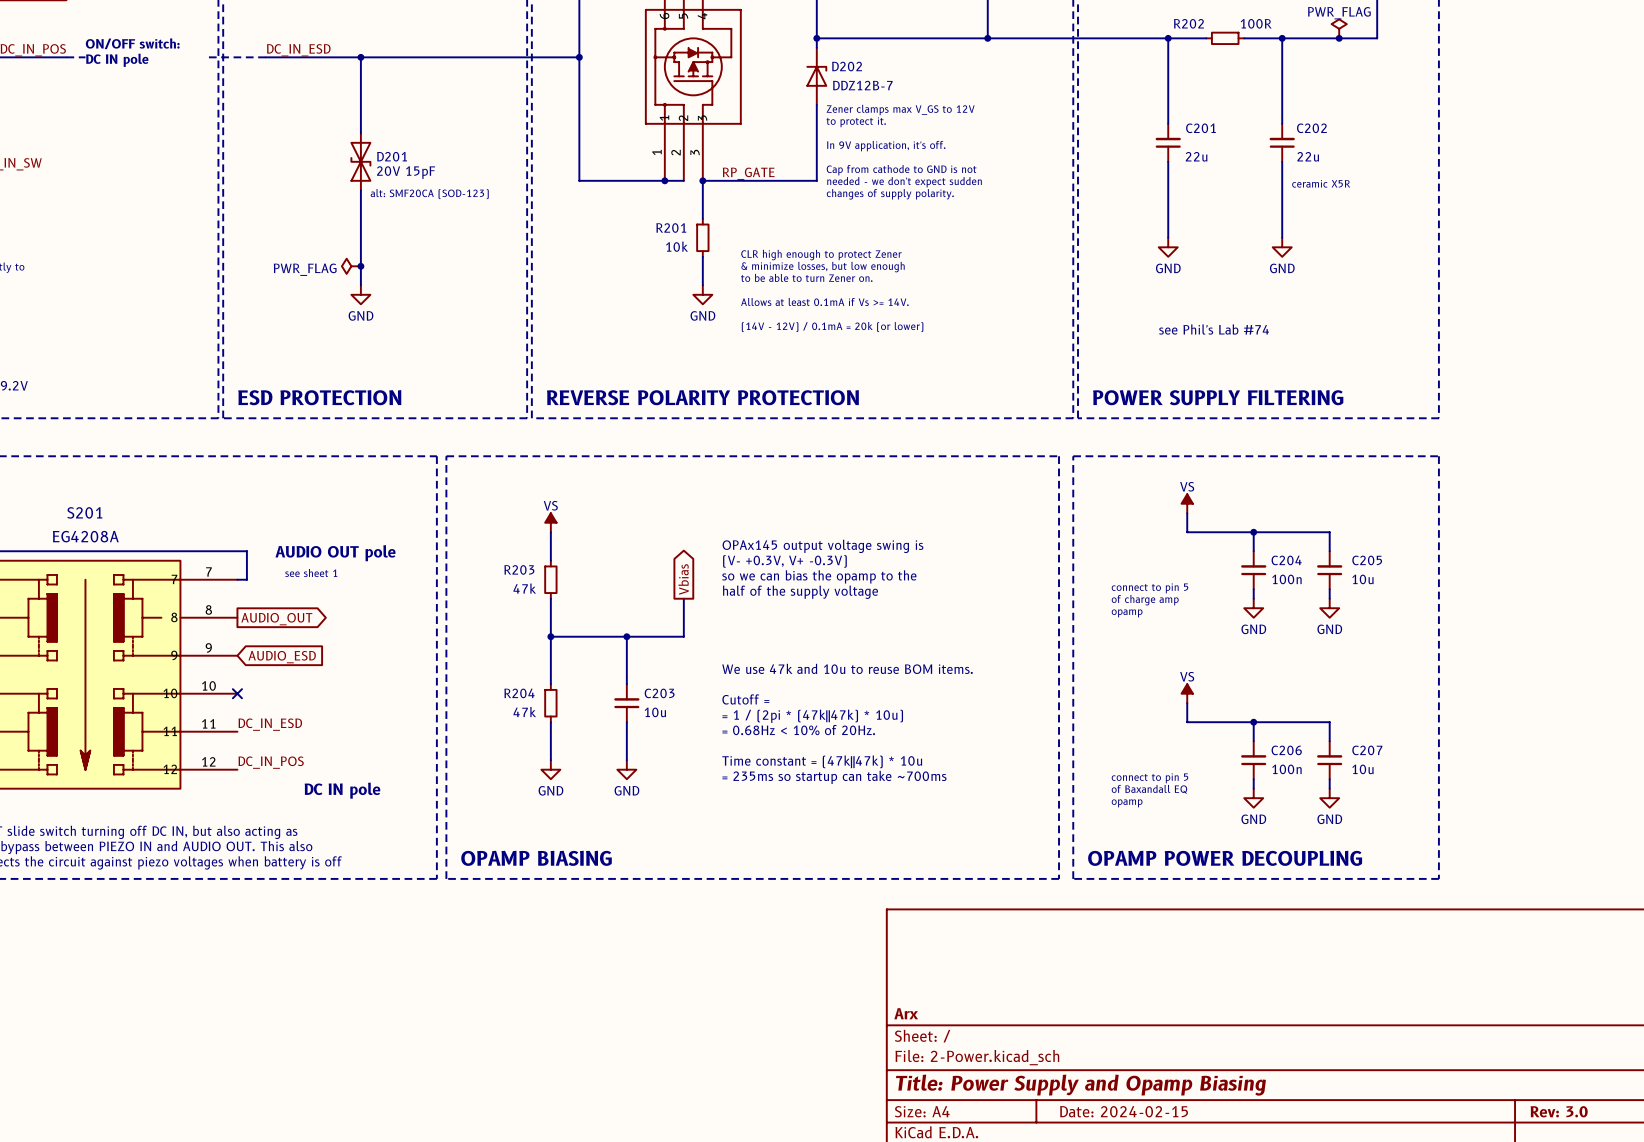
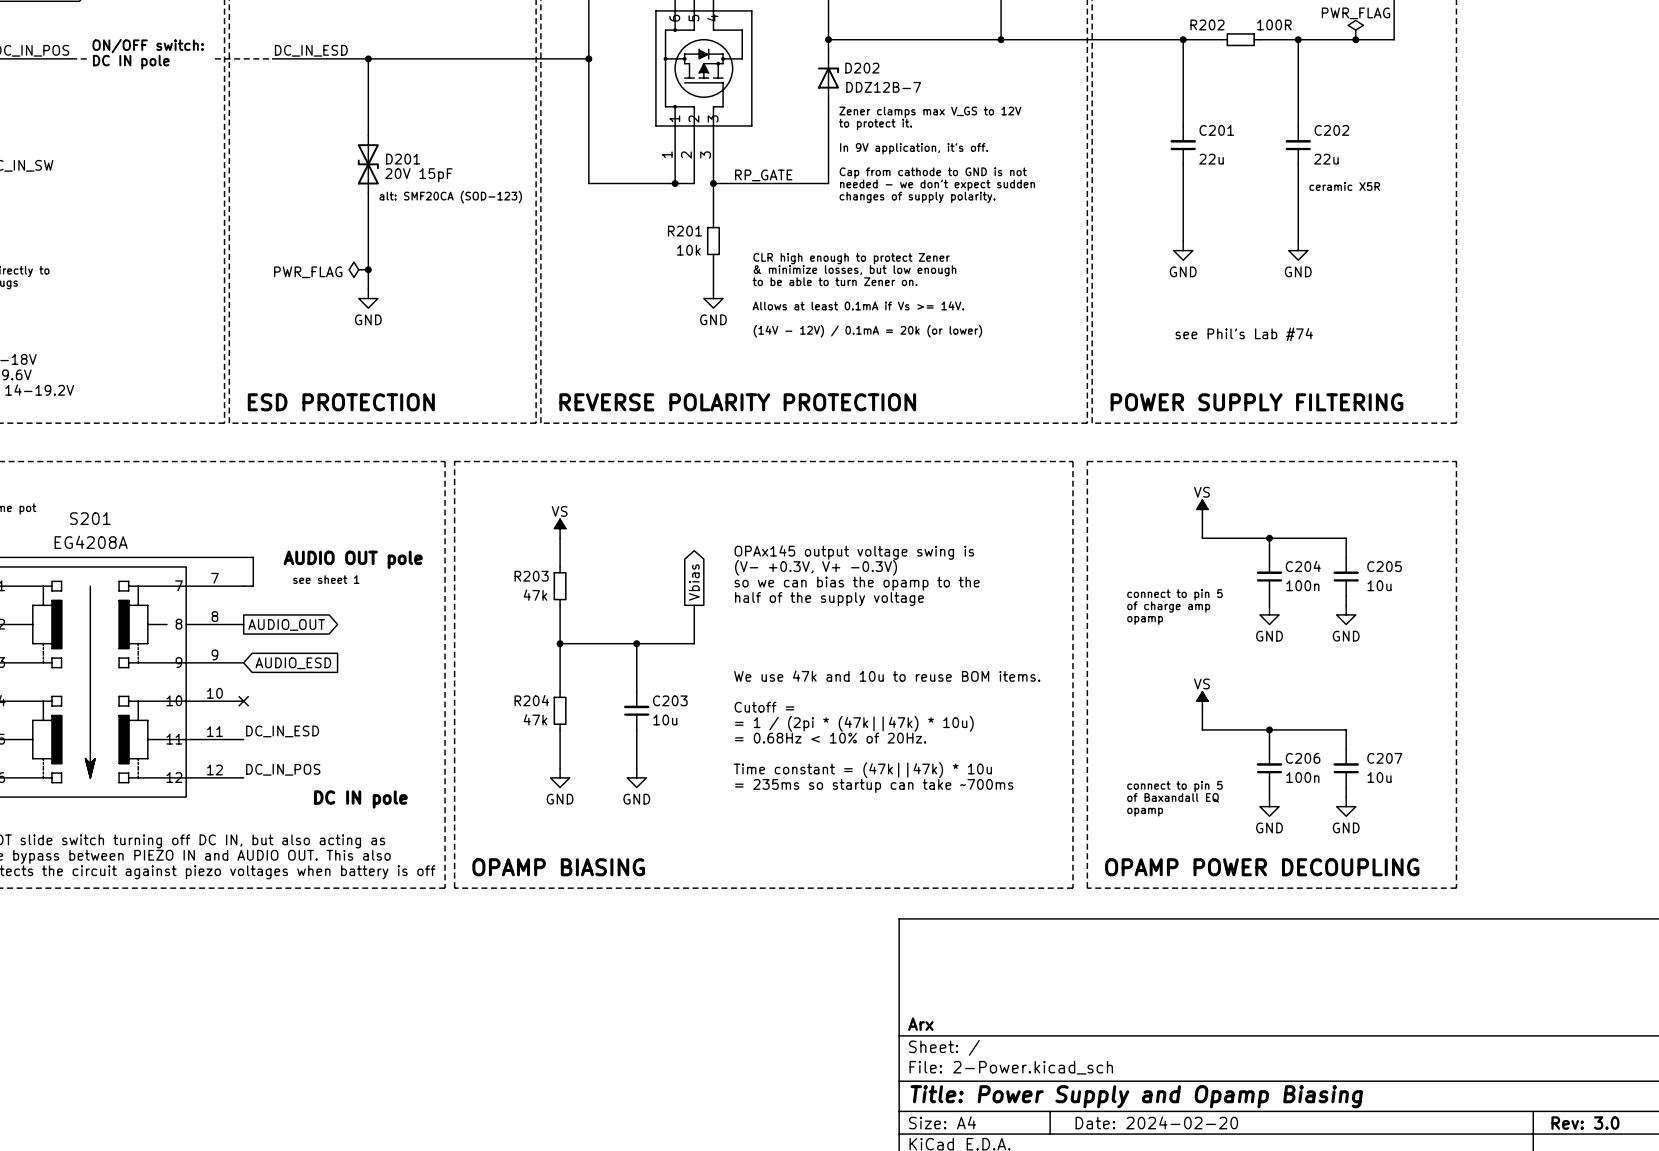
title block: Date: 2024-02-15 (1124, 1111) -> Date: 2024-02-20 (1156, 1122)

